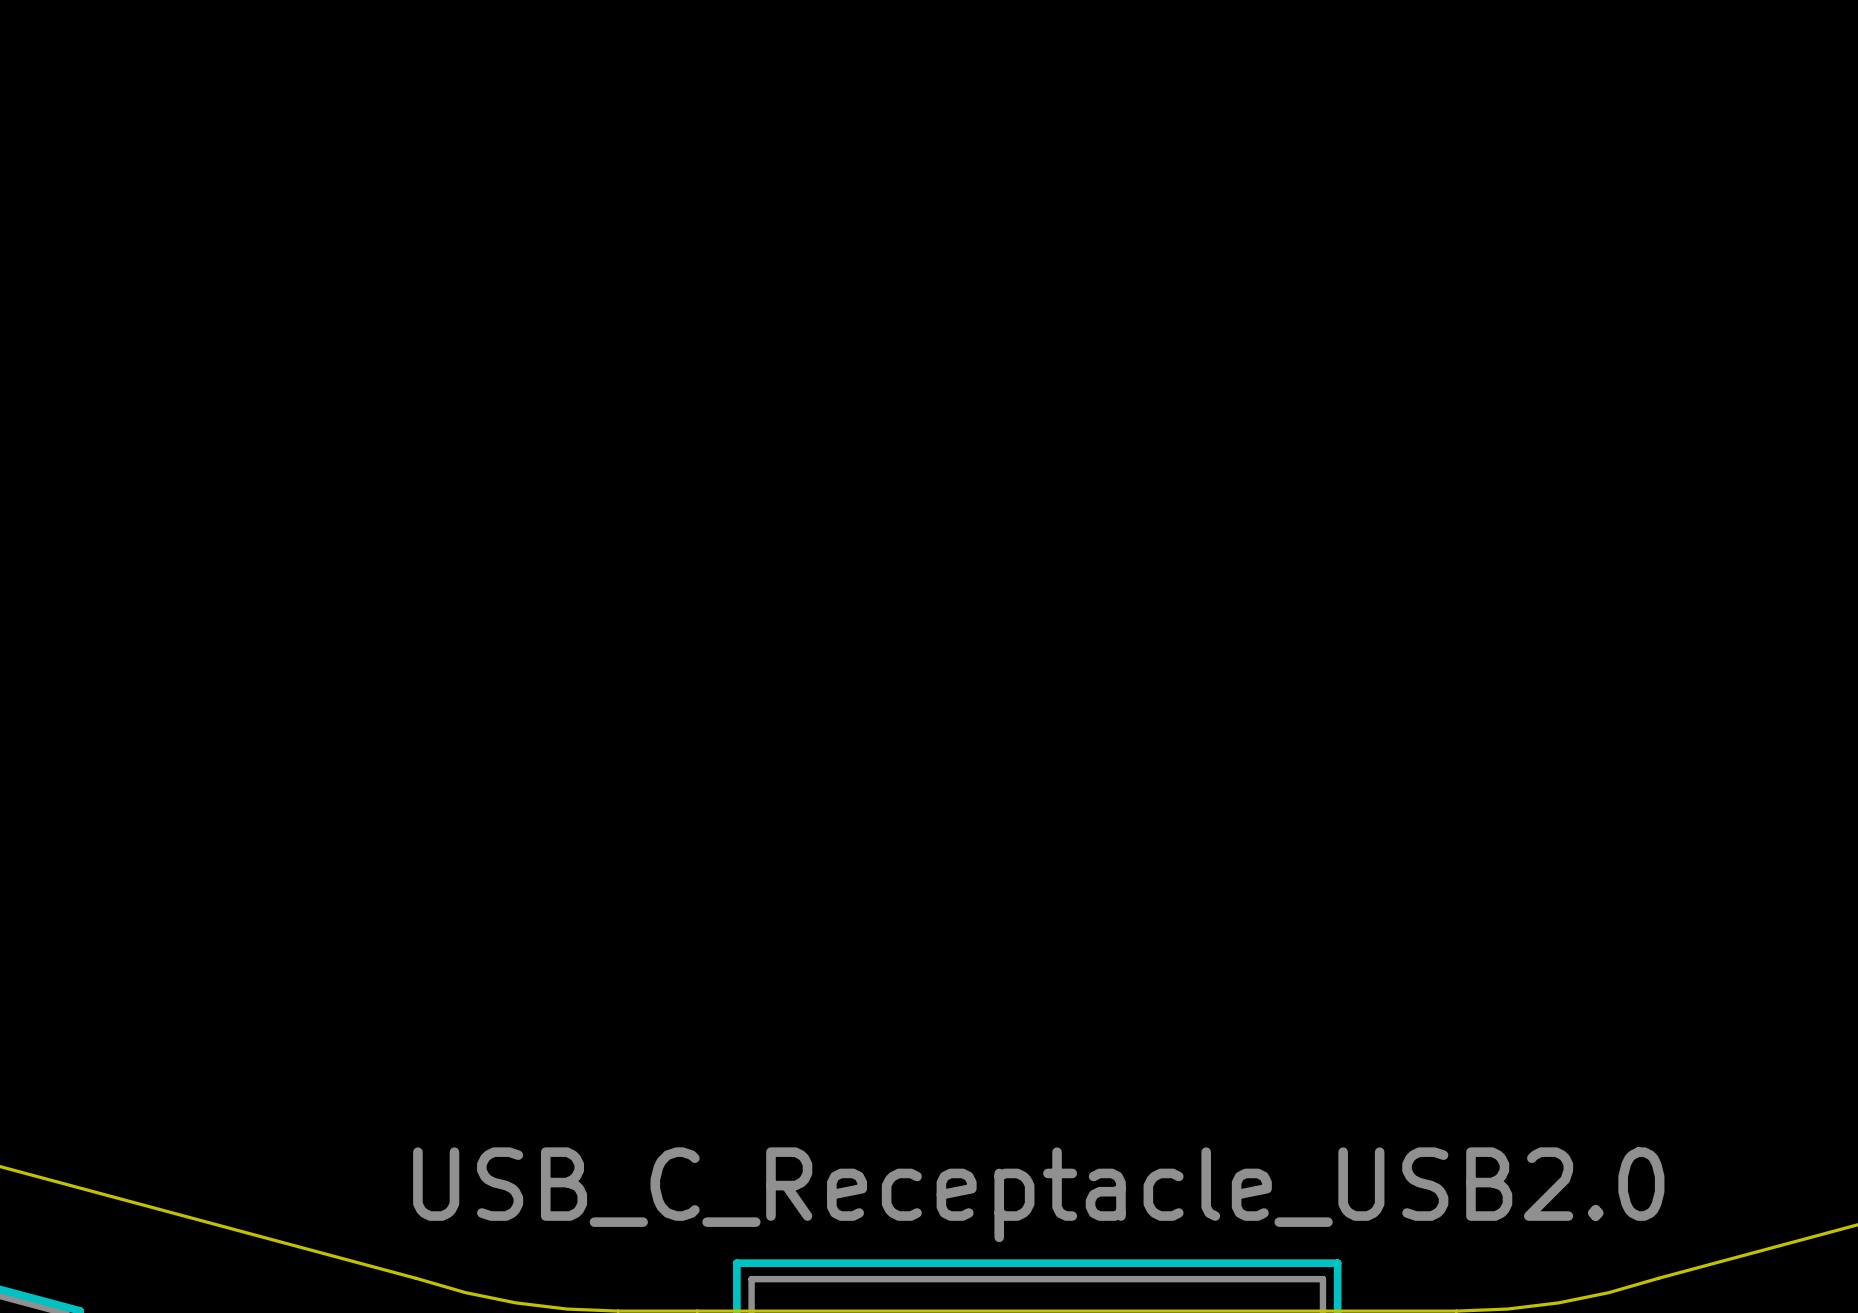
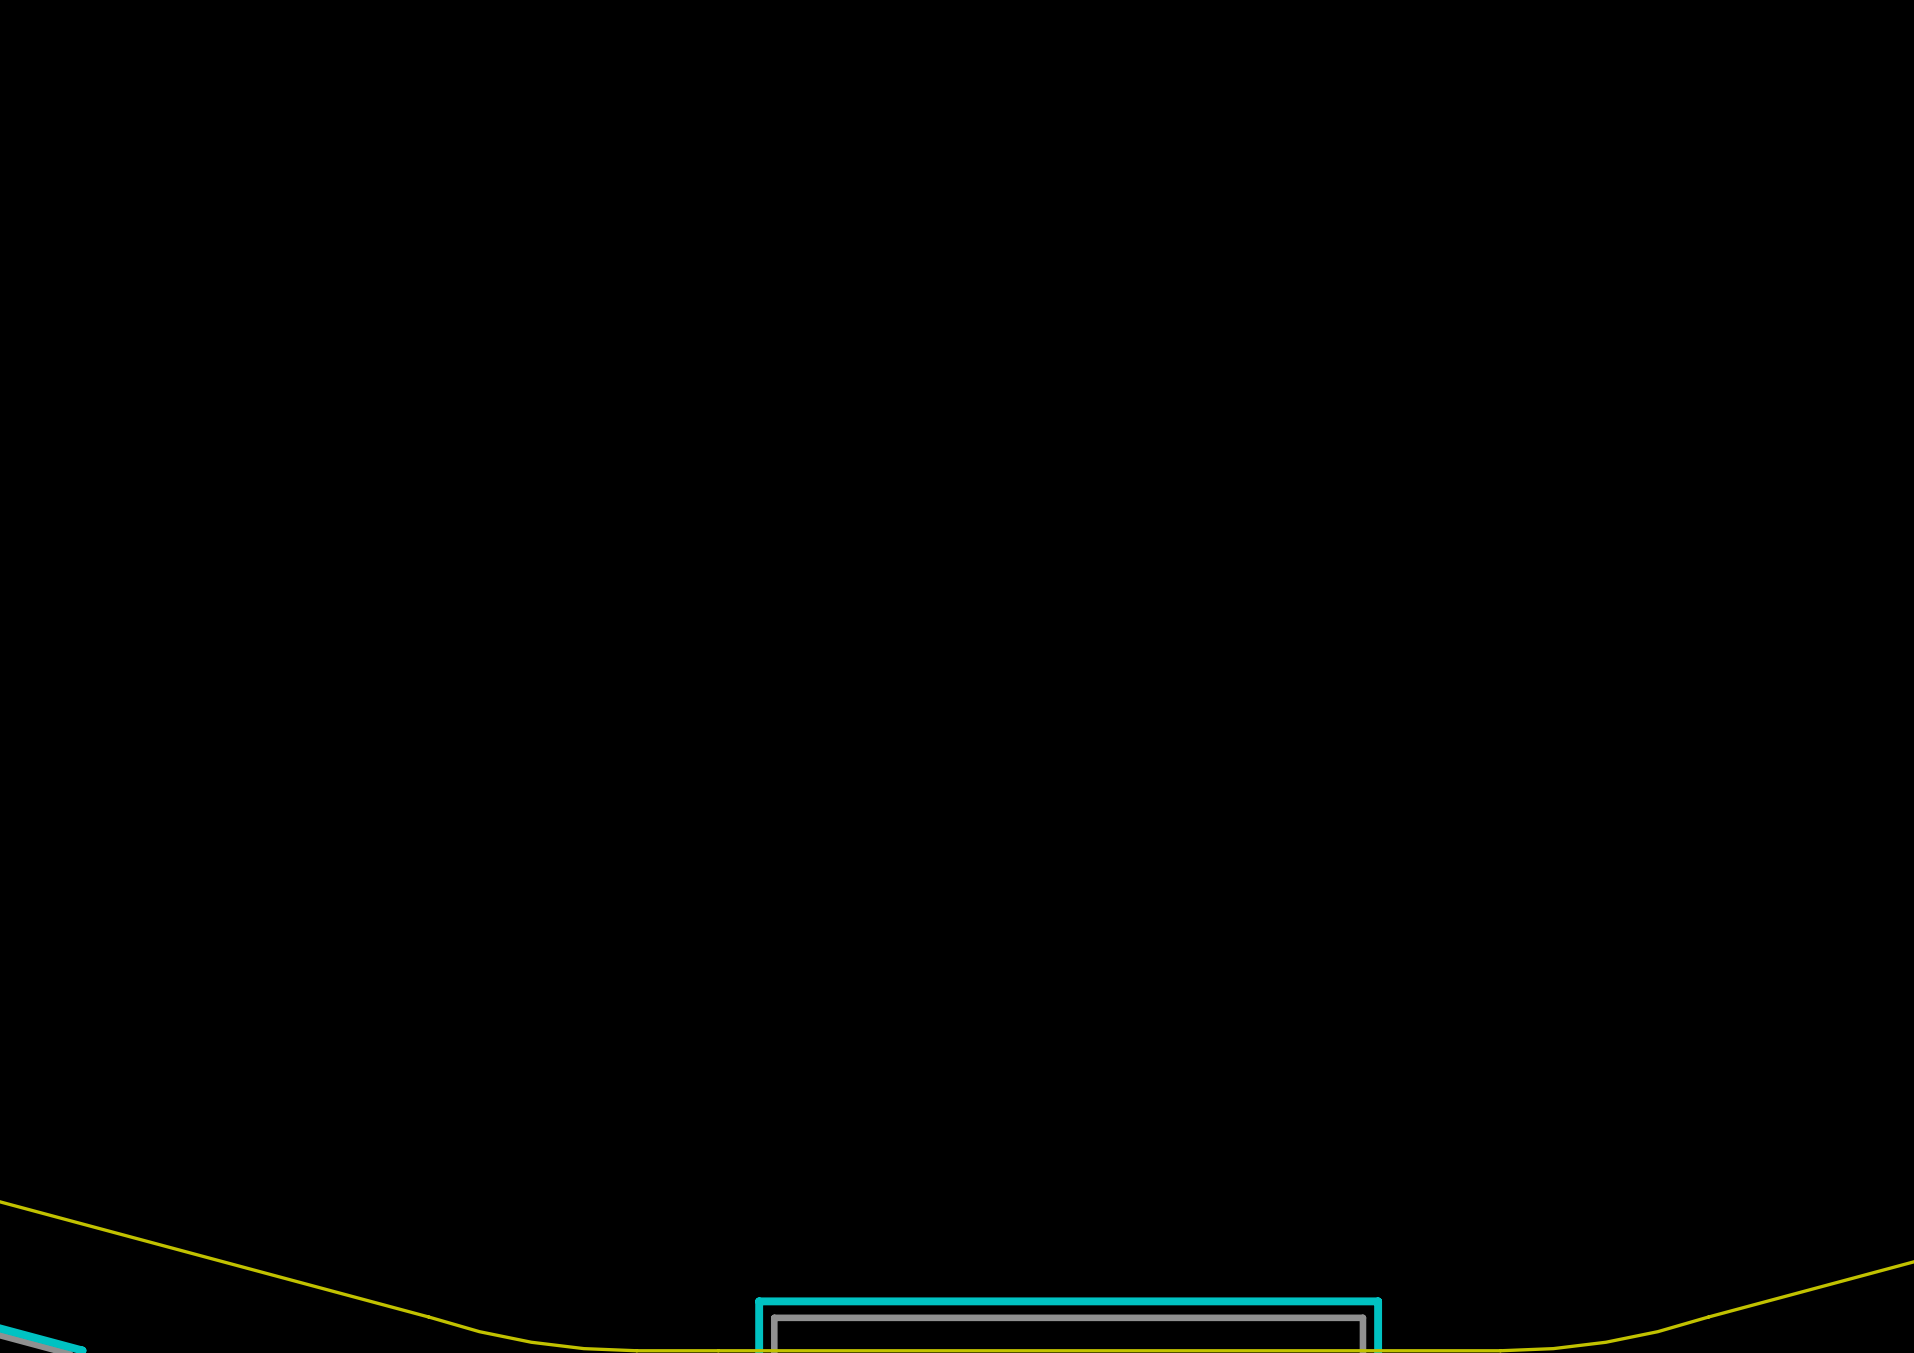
part value: USB_C_Receptacle_USB2.0 (1038, 1194) -> none

